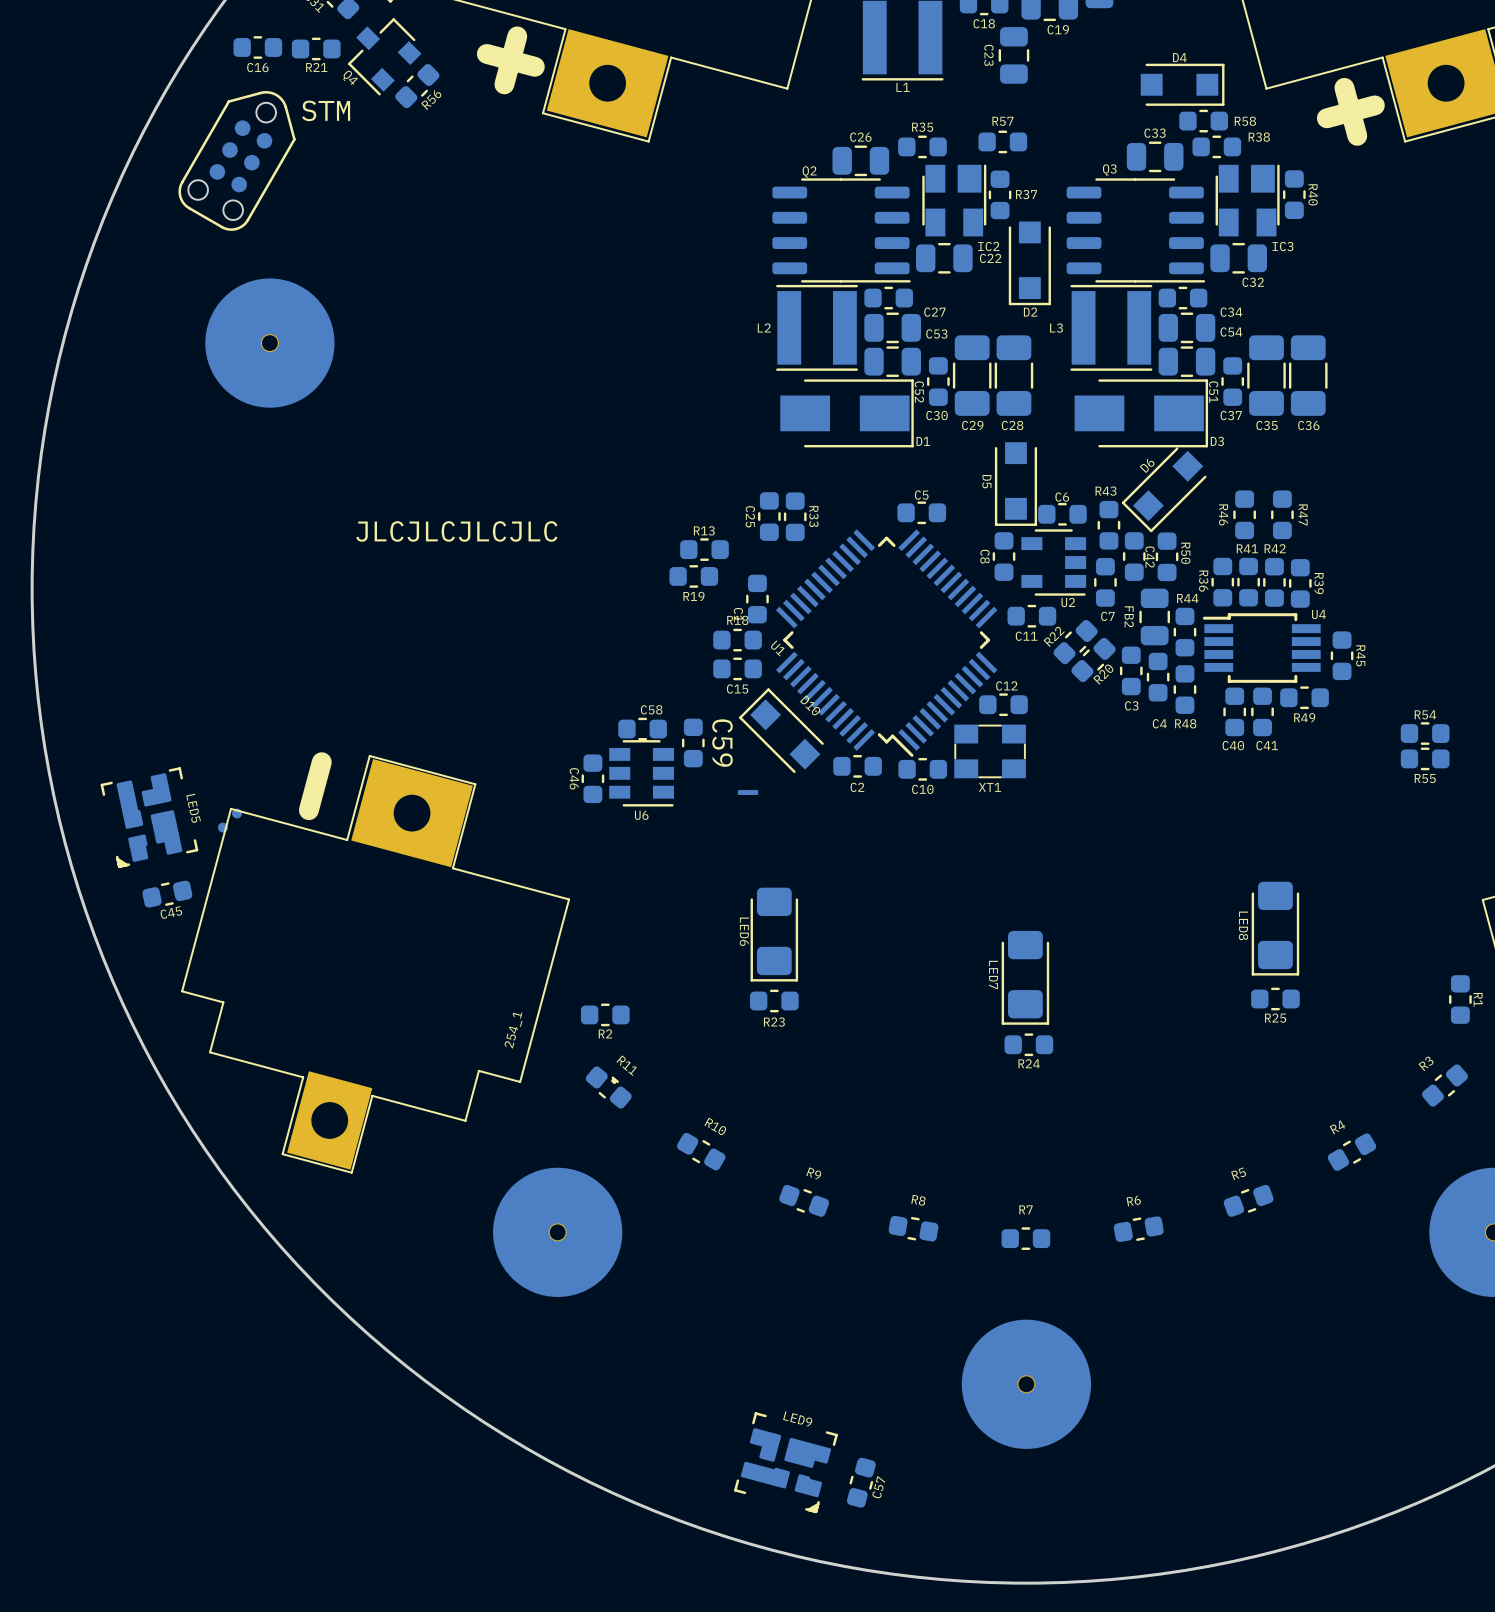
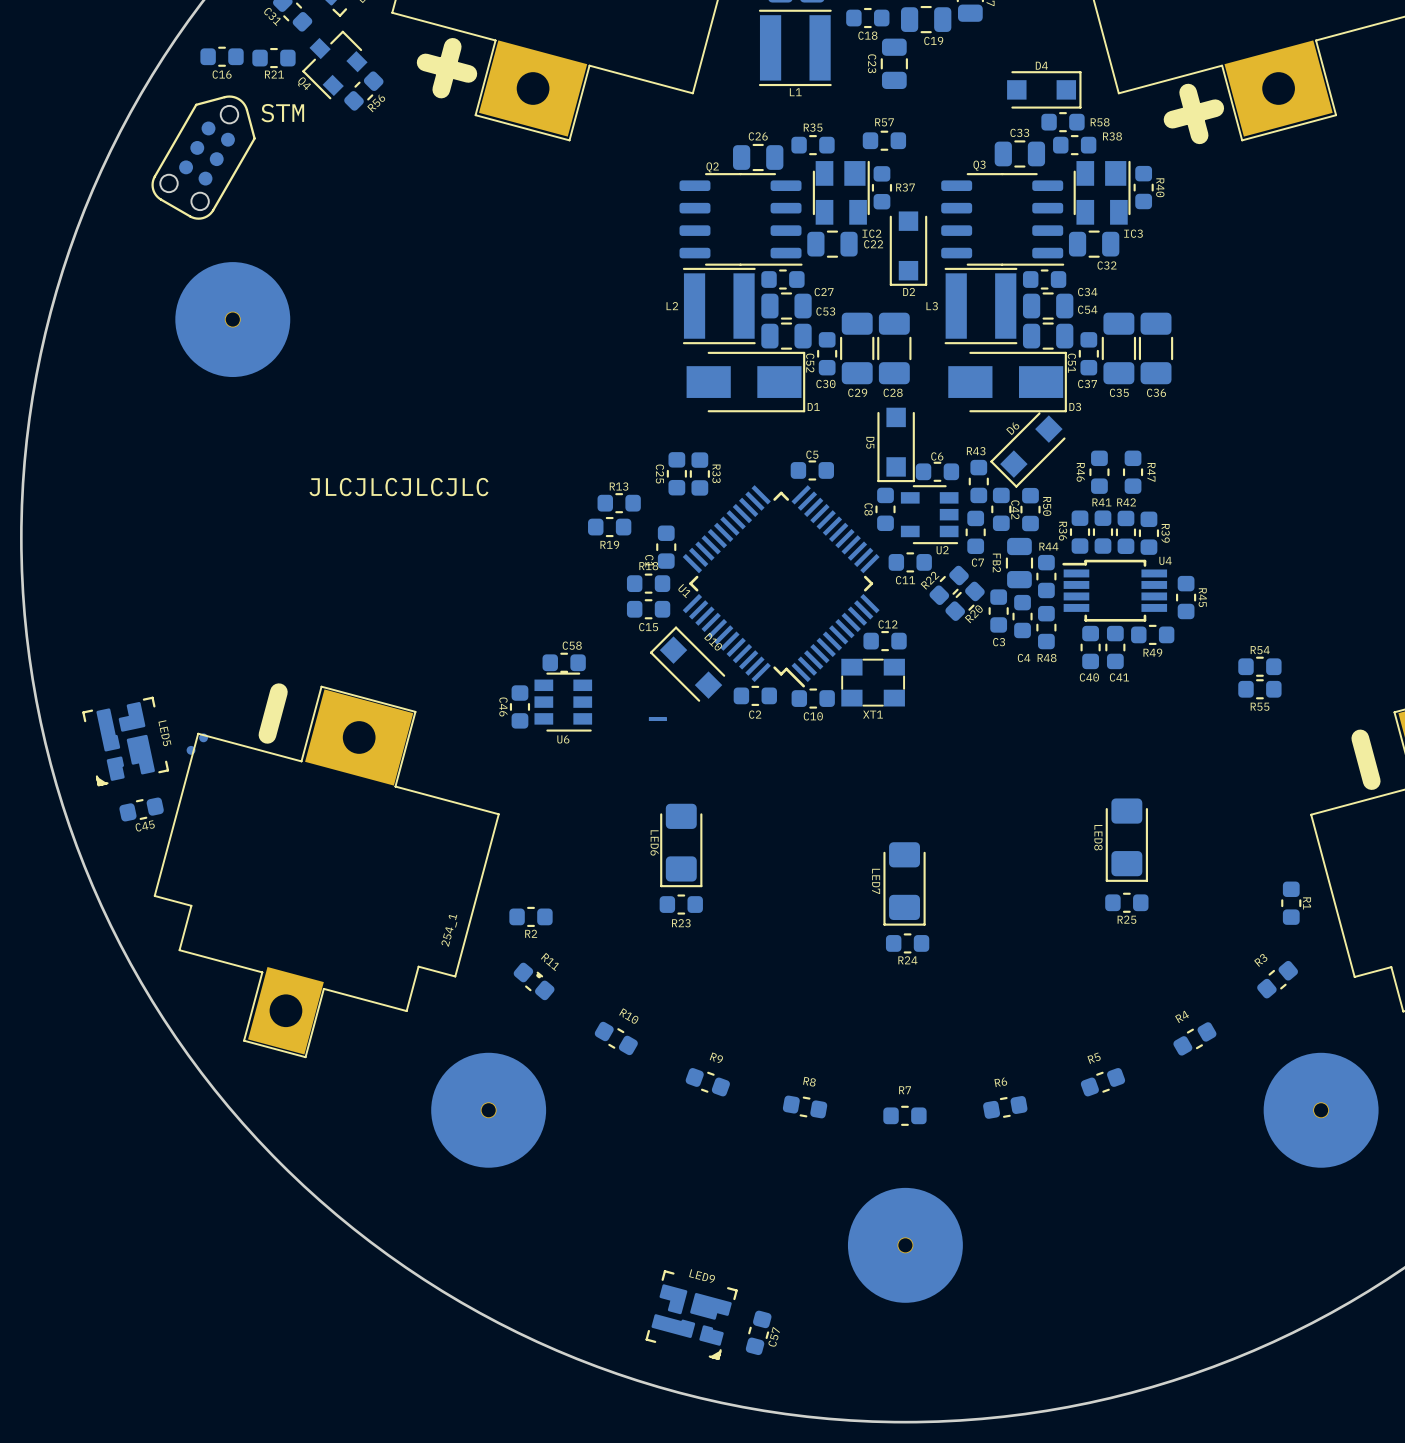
C59: (693, 742) -> none

